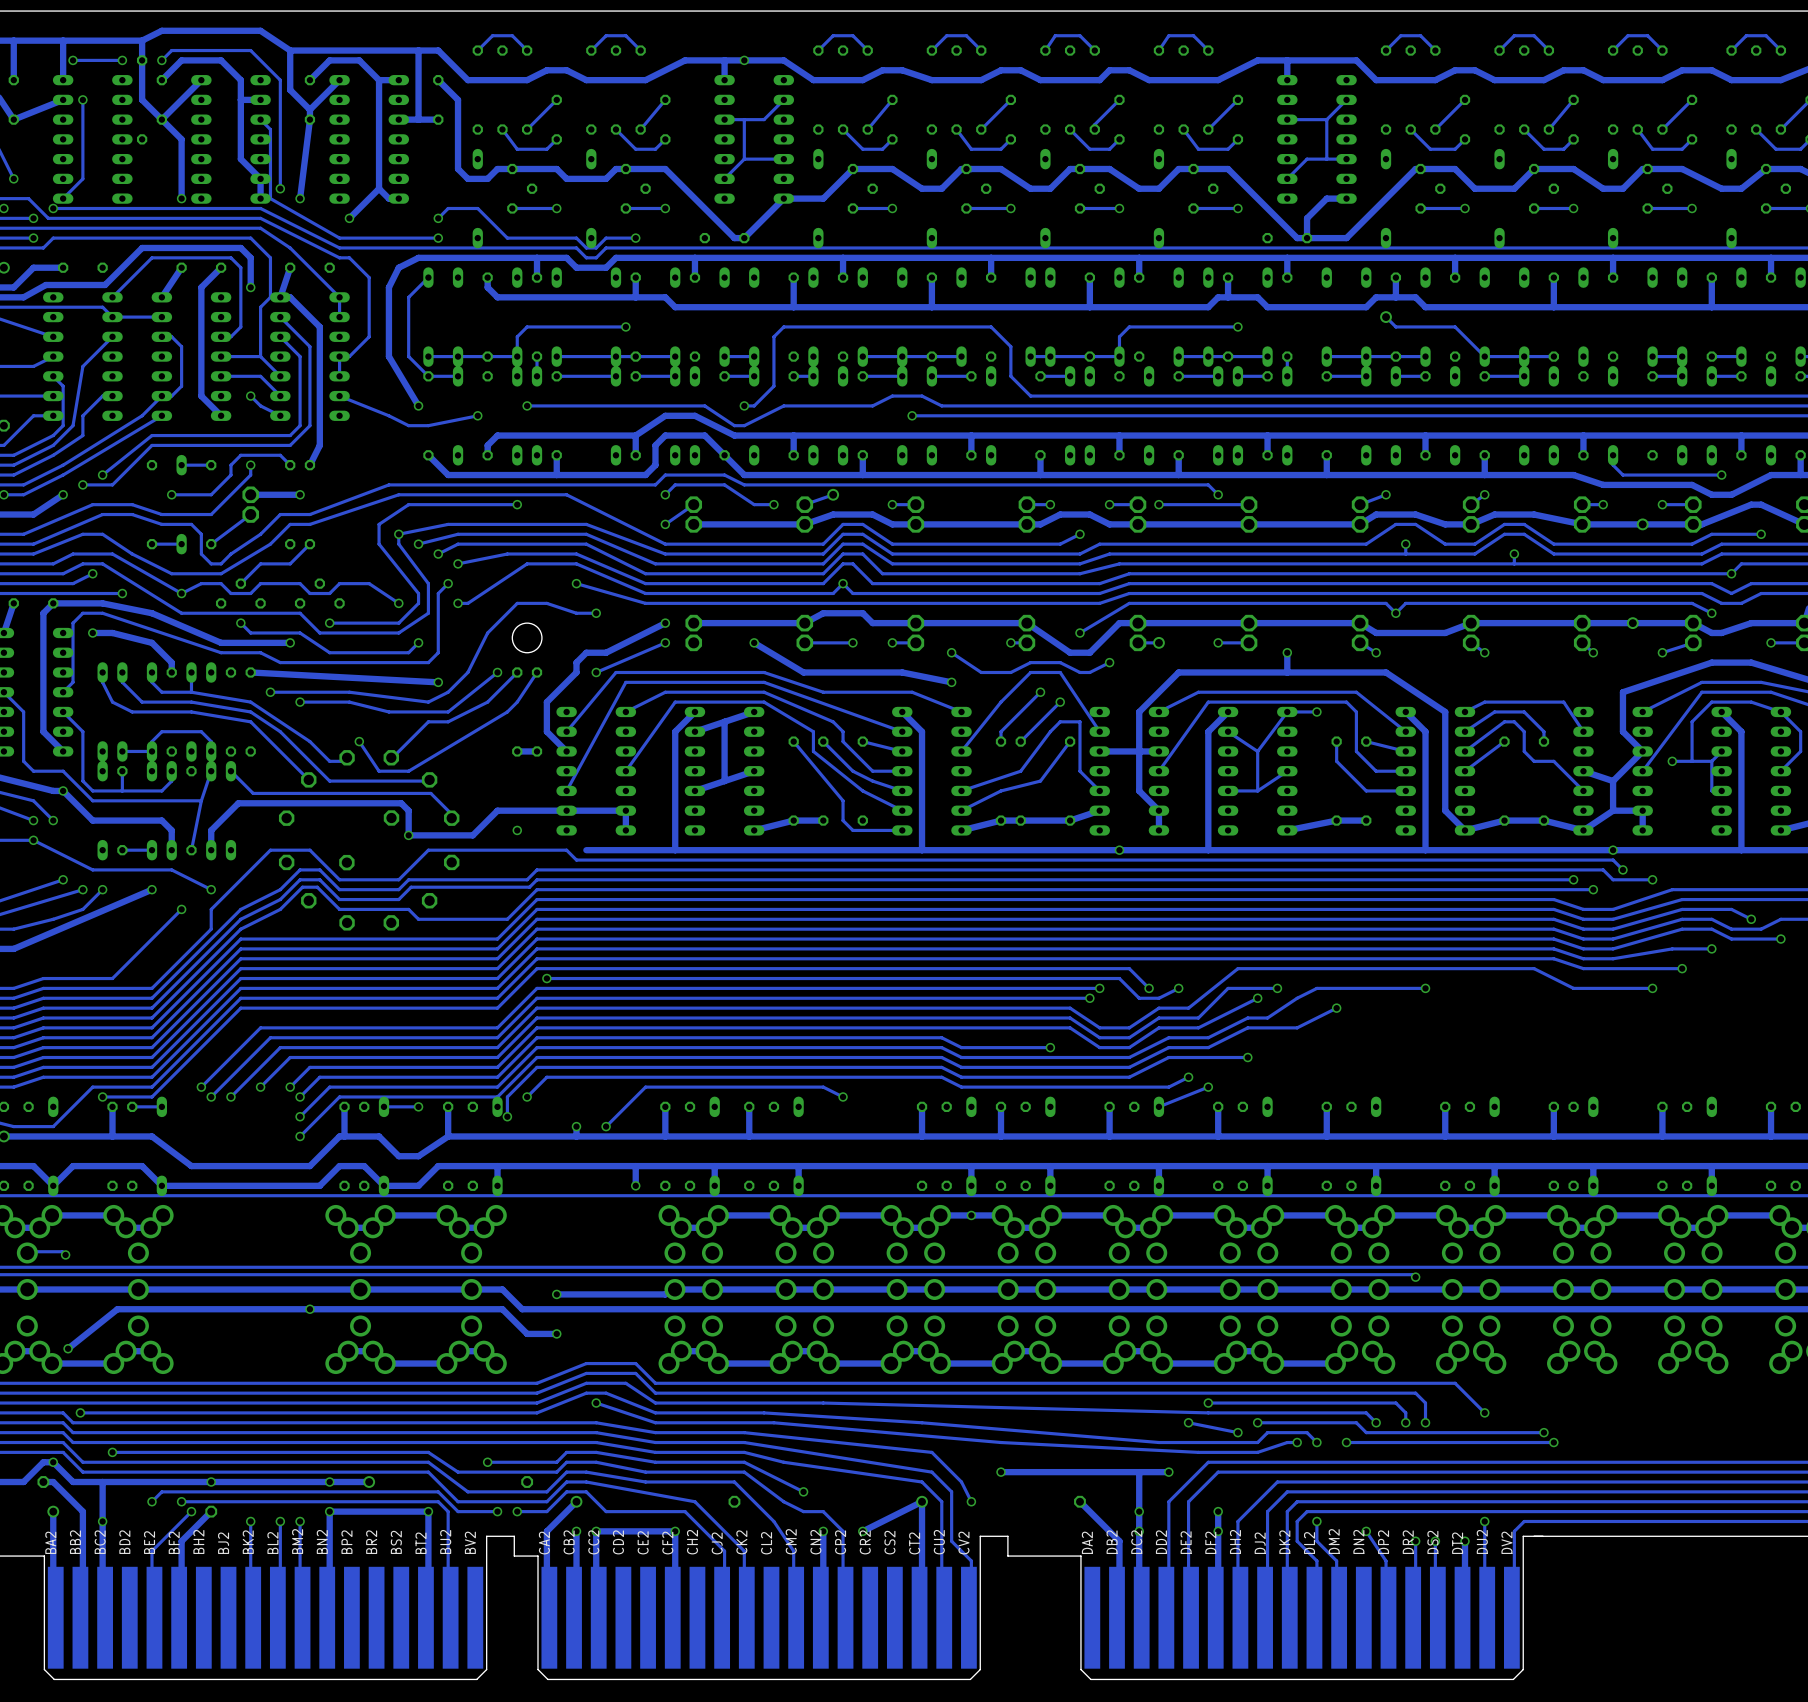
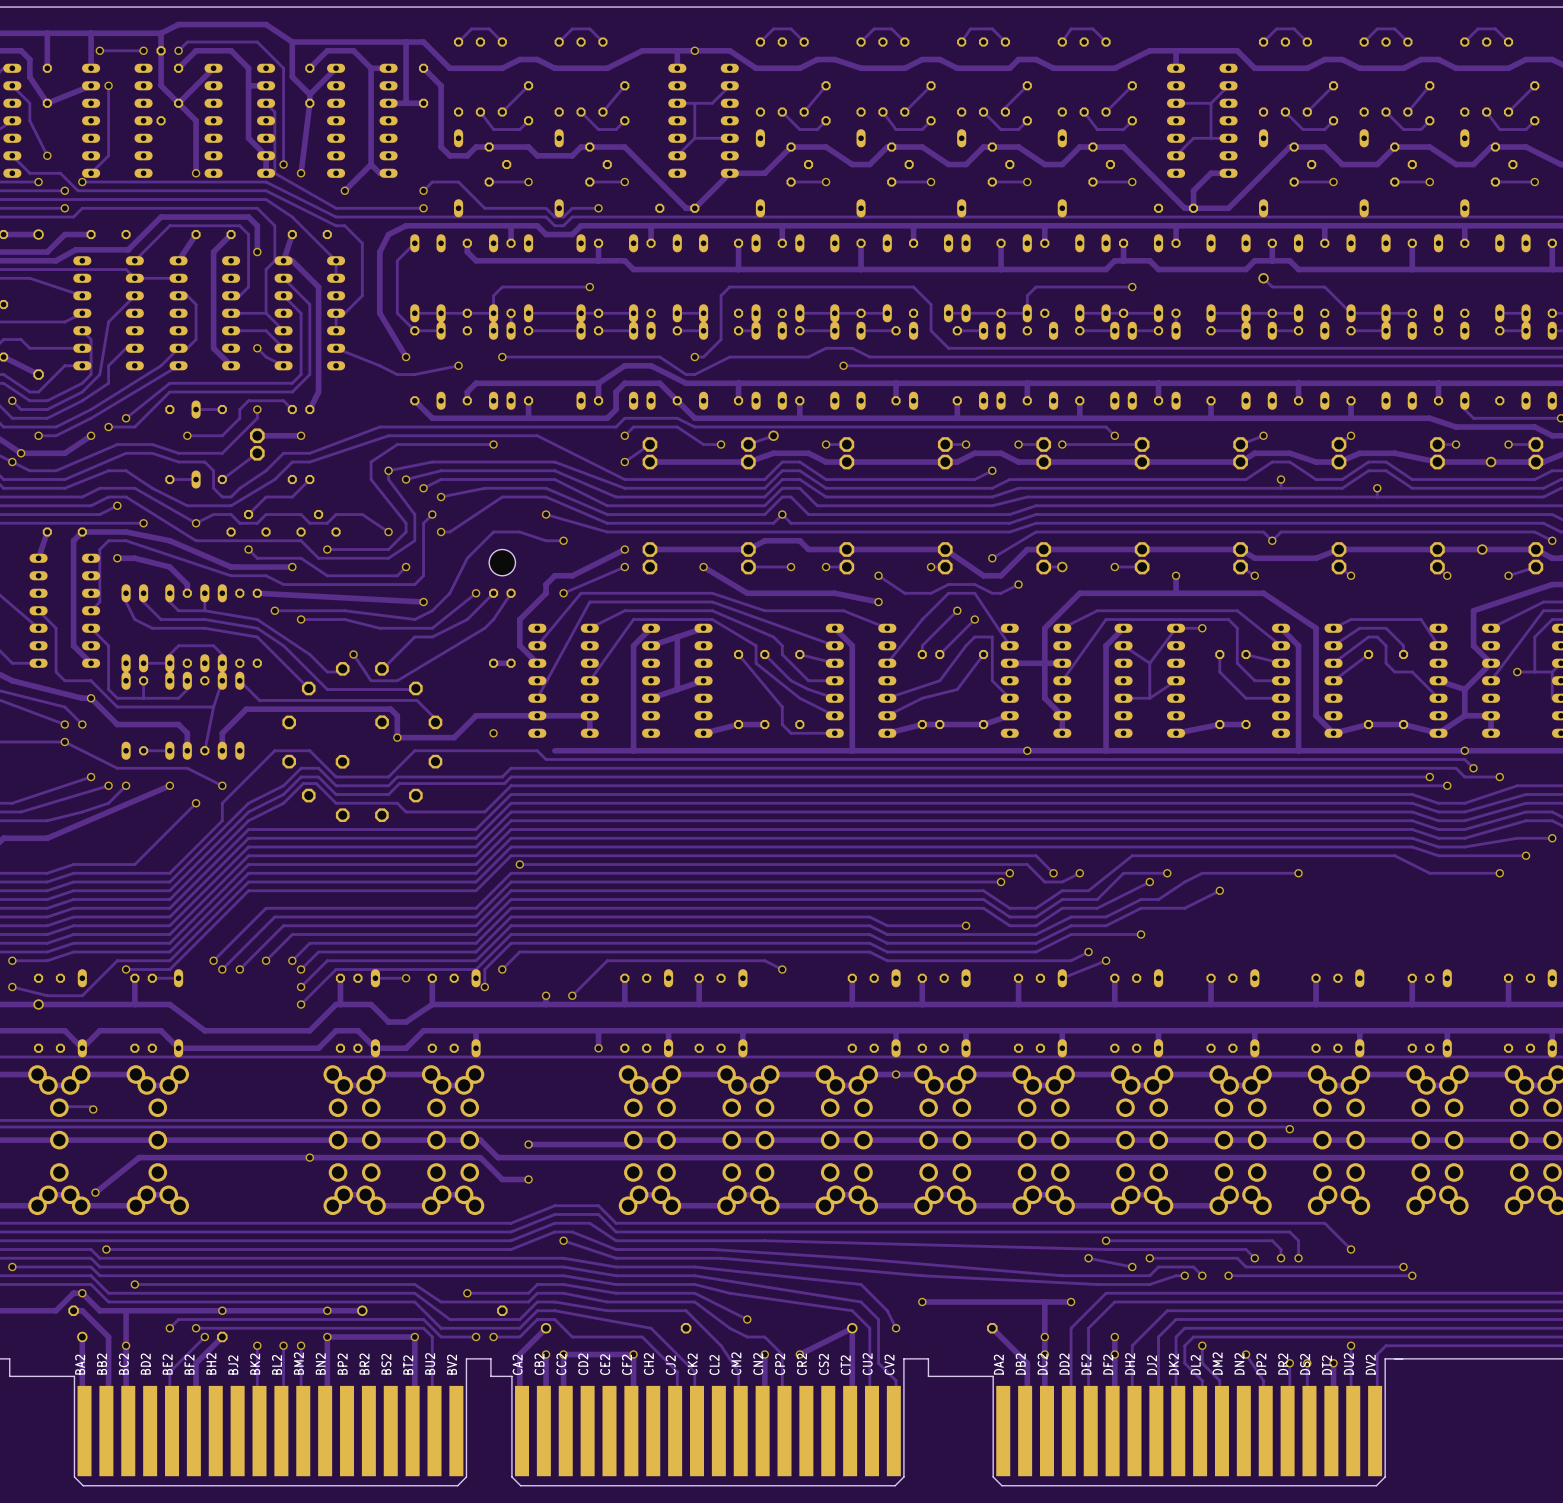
part footprint: [325, 1204, 396, 1375] -> [323, 1065, 386, 1216]
part footprint: [436, 1204, 507, 1375] -> [421, 1065, 485, 1216]

